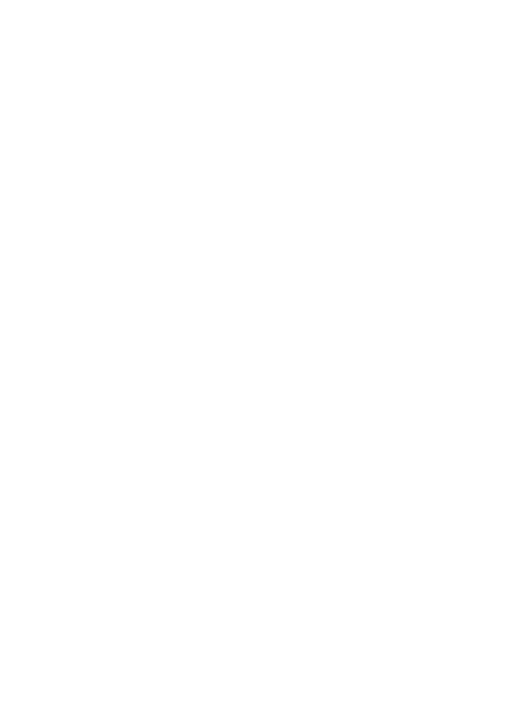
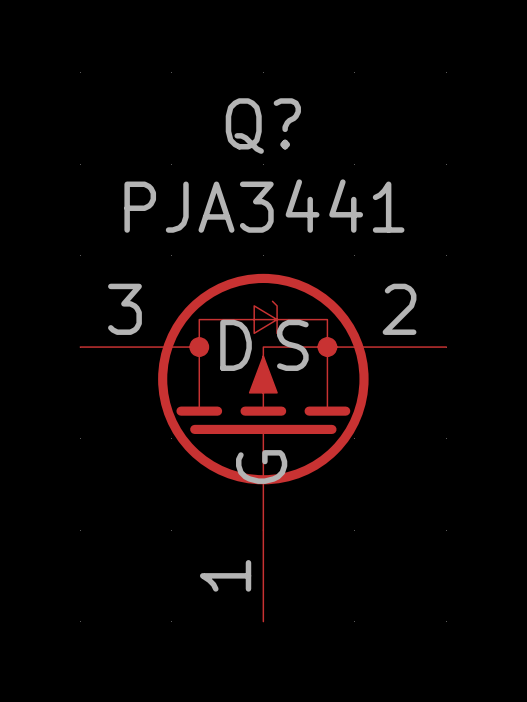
Q?: none -> PJA3441 (263, 447)

